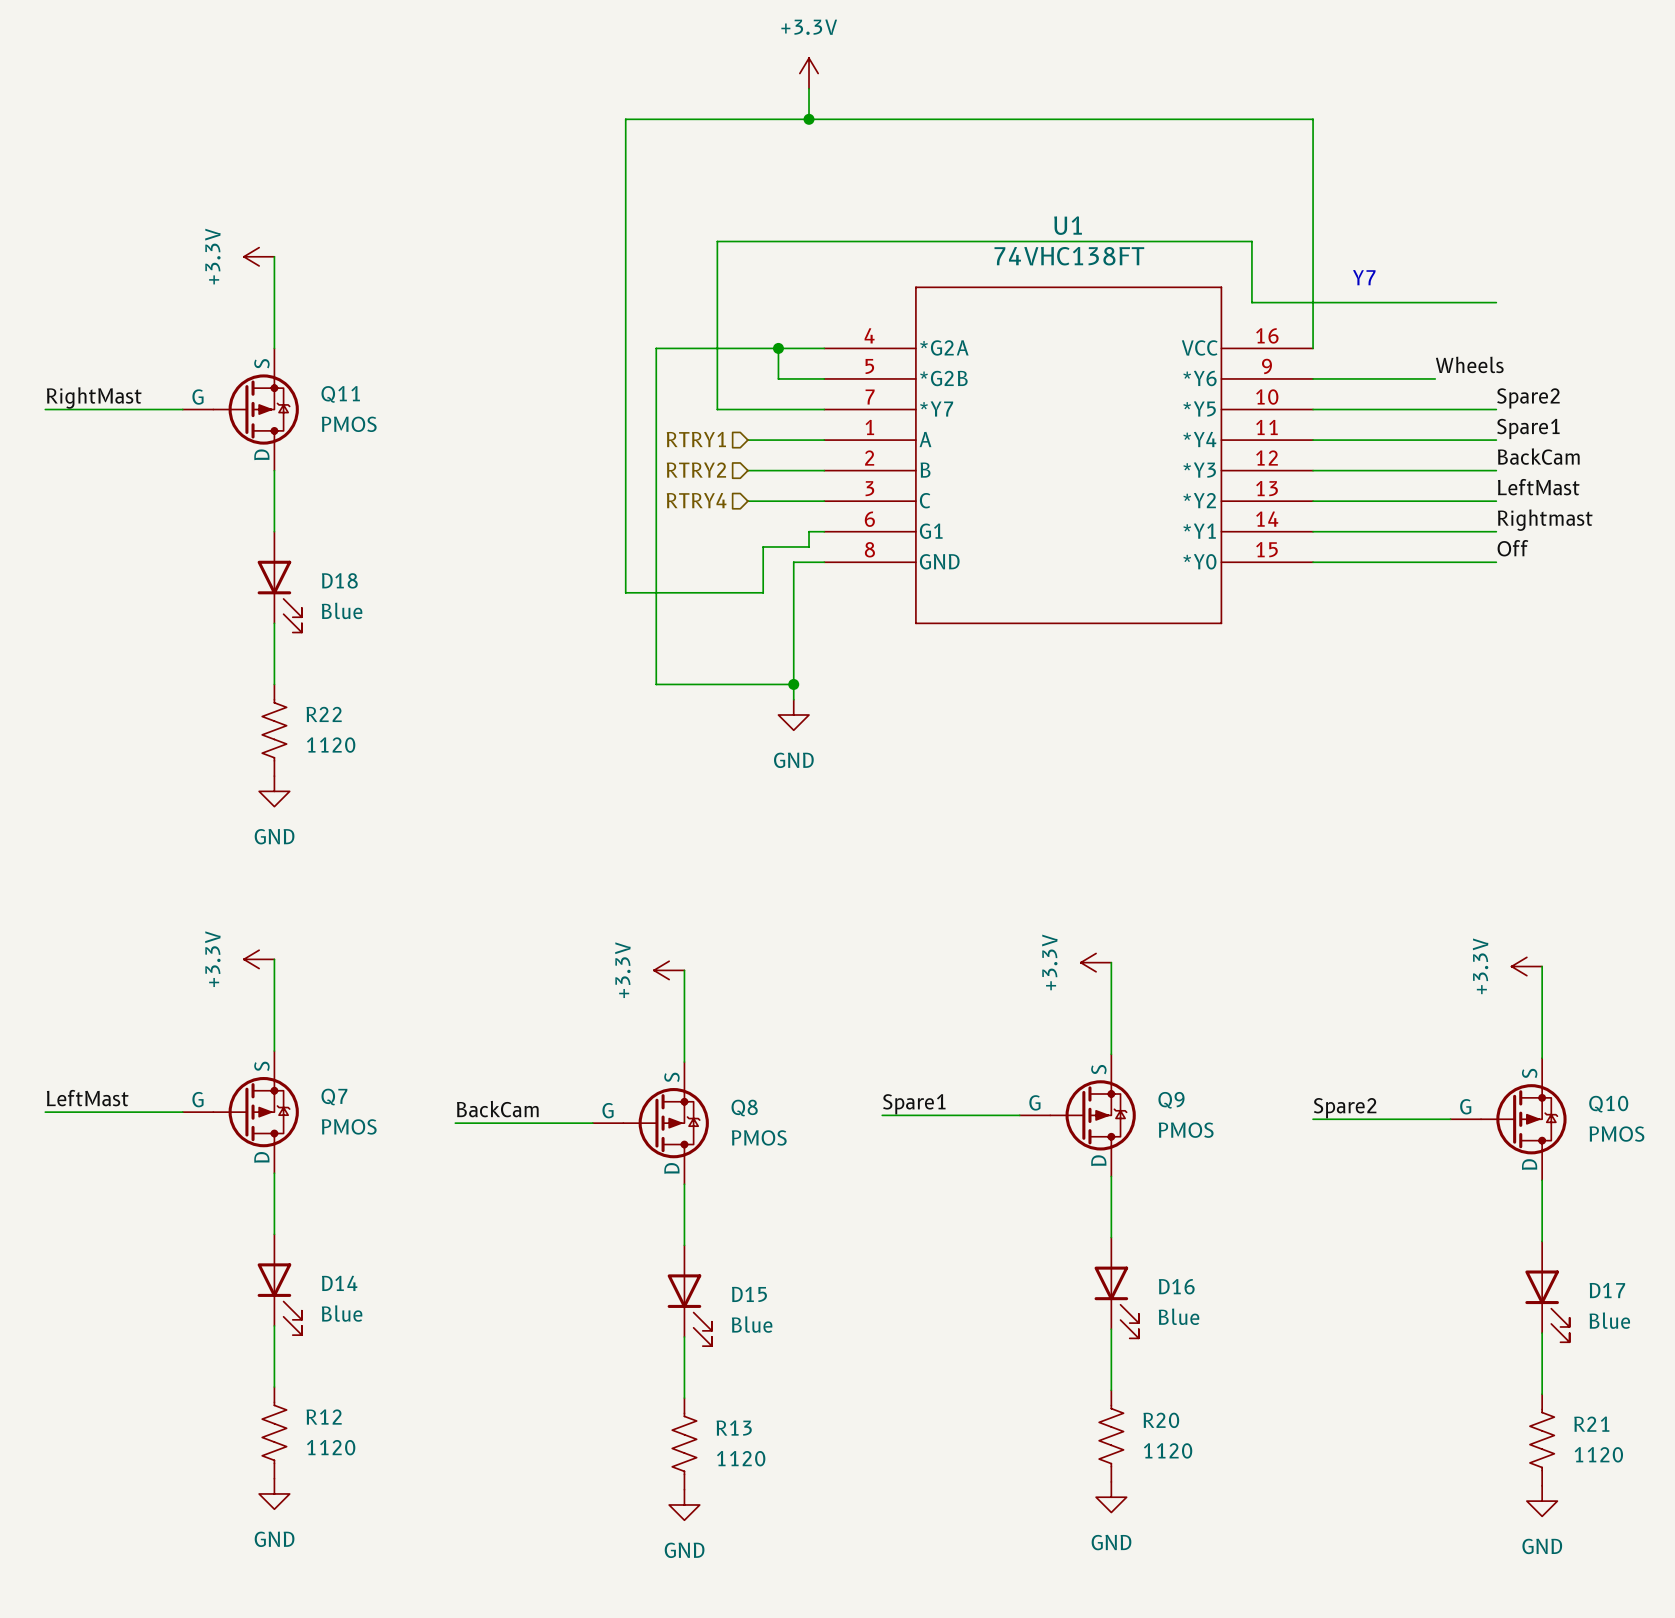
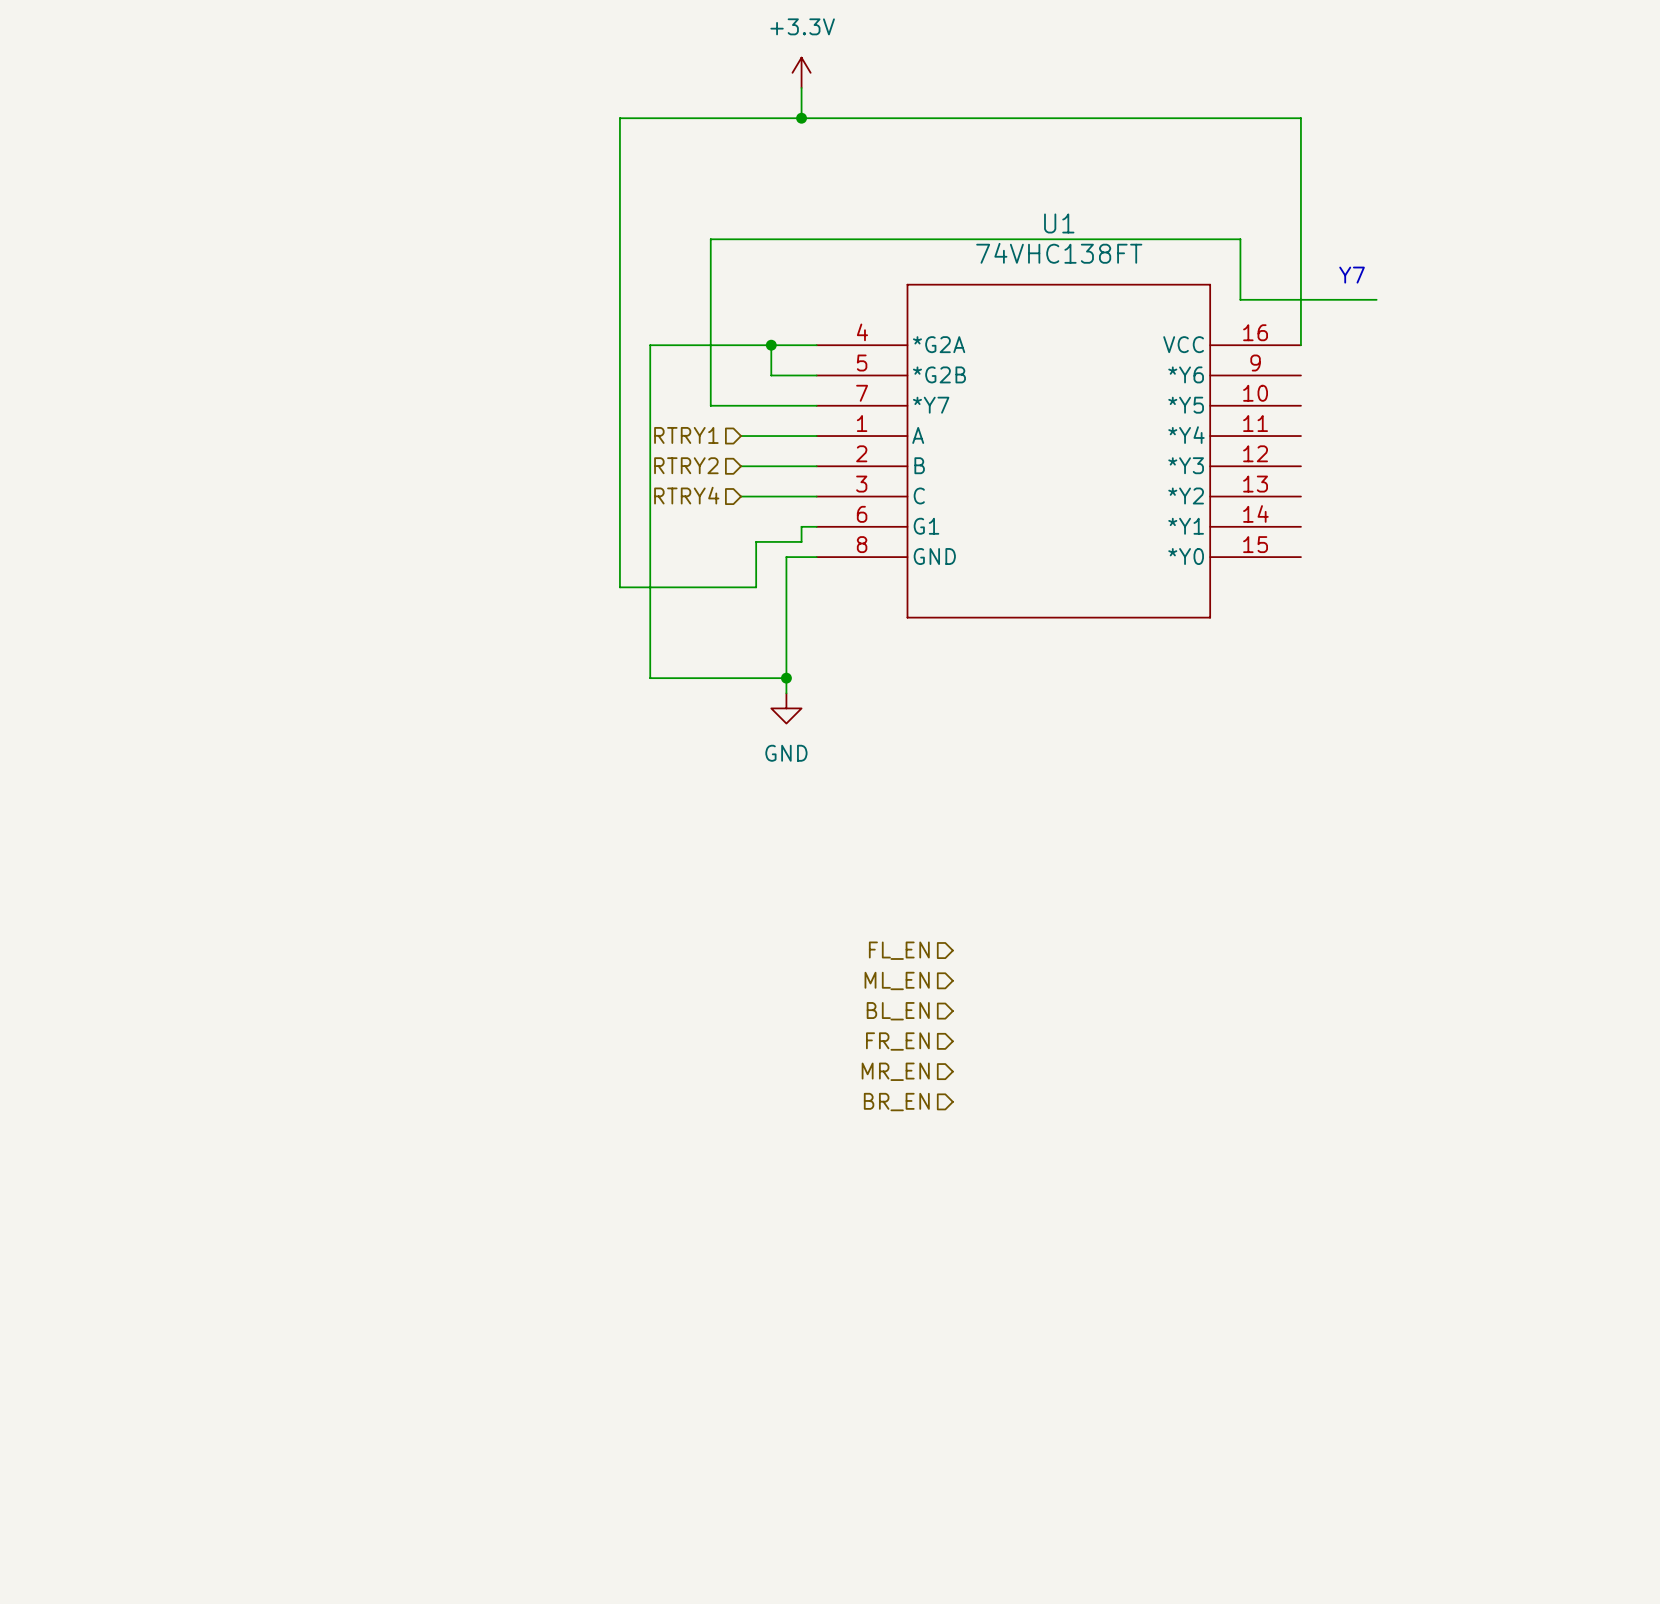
power symbol: +3.3V (259, 256) -> none
wire: (274, 256) (274, 348) -> none
wire: (1389, 302) (1496, 302) -> none
label: Wheels (1469, 364) -> none
wire: (1313, 378) (1435, 378) -> none
label: RightMast (94, 397) -> none
label: Spare2 (1528, 398) -> none
wire: (45, 409) (182, 409) -> none
Q11: PMOS (240, 409) -> none
wire: (1313, 409) (1496, 409) -> none
label: Spare1 (1528, 428) -> none
wire: (1313, 440) (1496, 440) -> none
label: BackCam (1538, 456) -> none
wire: (274, 470) (274, 531) -> none
wire: (1313, 470) (1496, 470) -> none
label: LeftMast (1538, 487) -> none
wire: (1313, 501) (1496, 501) -> none
label: Rightmast (1545, 520) -> none
wire: (1313, 531) (1496, 531) -> none
label: Off (1512, 548) -> none
wire: (1313, 562) (1496, 562) -> none
D18: Blue (279, 582) -> none
wire: (274, 623) (274, 684) -> none
R22: 1120 (274, 730) -> none
power symbol: GND (274, 791) -> none
power symbol: +3.3V (259, 959) -> none
wire: (274, 959) (274, 1051) -> none
hierarchical label: none -> FL_EN (899, 950)
power symbol: +3.3V (1096, 962) -> none
wire: (1111, 962) (1111, 1054) -> none
power symbol: +3.3V (1526, 966) -> none
wire: (1542, 966) (1542, 1058) -> none
power symbol: +3.3V (669, 970) -> none
wire: (684, 970) (684, 1062) -> none
hierarchical label: none -> ML_EN (897, 980)
hierarchical label: none -> BL_EN (898, 1011)
hierarchical label: none -> FR_EN (897, 1041)
hierarchical label: none -> MR_EN (895, 1071)
label: LeftMast (87, 1098) -> none
label: Spare1 (914, 1104) -> none
label: Spare2 (1345, 1108) -> none
label: BackCam (497, 1109) -> none
wire: (45, 1112) (182, 1112) -> none
Q7: PMOS (240, 1112) -> none
hierarchical label: none -> BR_EN (896, 1102)
wire: (882, 1115) (1019, 1115) -> none
Q9: PMOS (1077, 1115) -> none
wire: (1313, 1119) (1450, 1119) -> none
Q10: PMOS (1508, 1119) -> none
wire: (455, 1123) (592, 1123) -> none
Q8: PMOS (650, 1123) -> none
wire: (274, 1173) (274, 1234) -> none
wire: (1111, 1176) (1111, 1237) -> none
wire: (1542, 1180) (1542, 1241) -> none
wire: (684, 1184) (684, 1245) -> none
D14: Blue (279, 1284) -> none
D16: Blue (1116, 1287) -> none
D17: Blue (1547, 1291) -> none
D15: Blue (689, 1295) -> none
wire: (274, 1325) (274, 1387) -> none
wire: (1111, 1329) (1111, 1390) -> none
wire: (1542, 1333) (1542, 1394) -> none
wire: (684, 1336) (684, 1398) -> none
R12: 1120 (274, 1432) -> none
R20: 1120 (1111, 1436) -> none
R21: 1120 (1542, 1440) -> none
R13: 1120 (684, 1443) -> none
power symbol: GND (274, 1493) -> none
power symbol: GND (1111, 1497) -> none
power symbol: GND (1542, 1501) -> none
power symbol: GND (684, 1504) -> none

